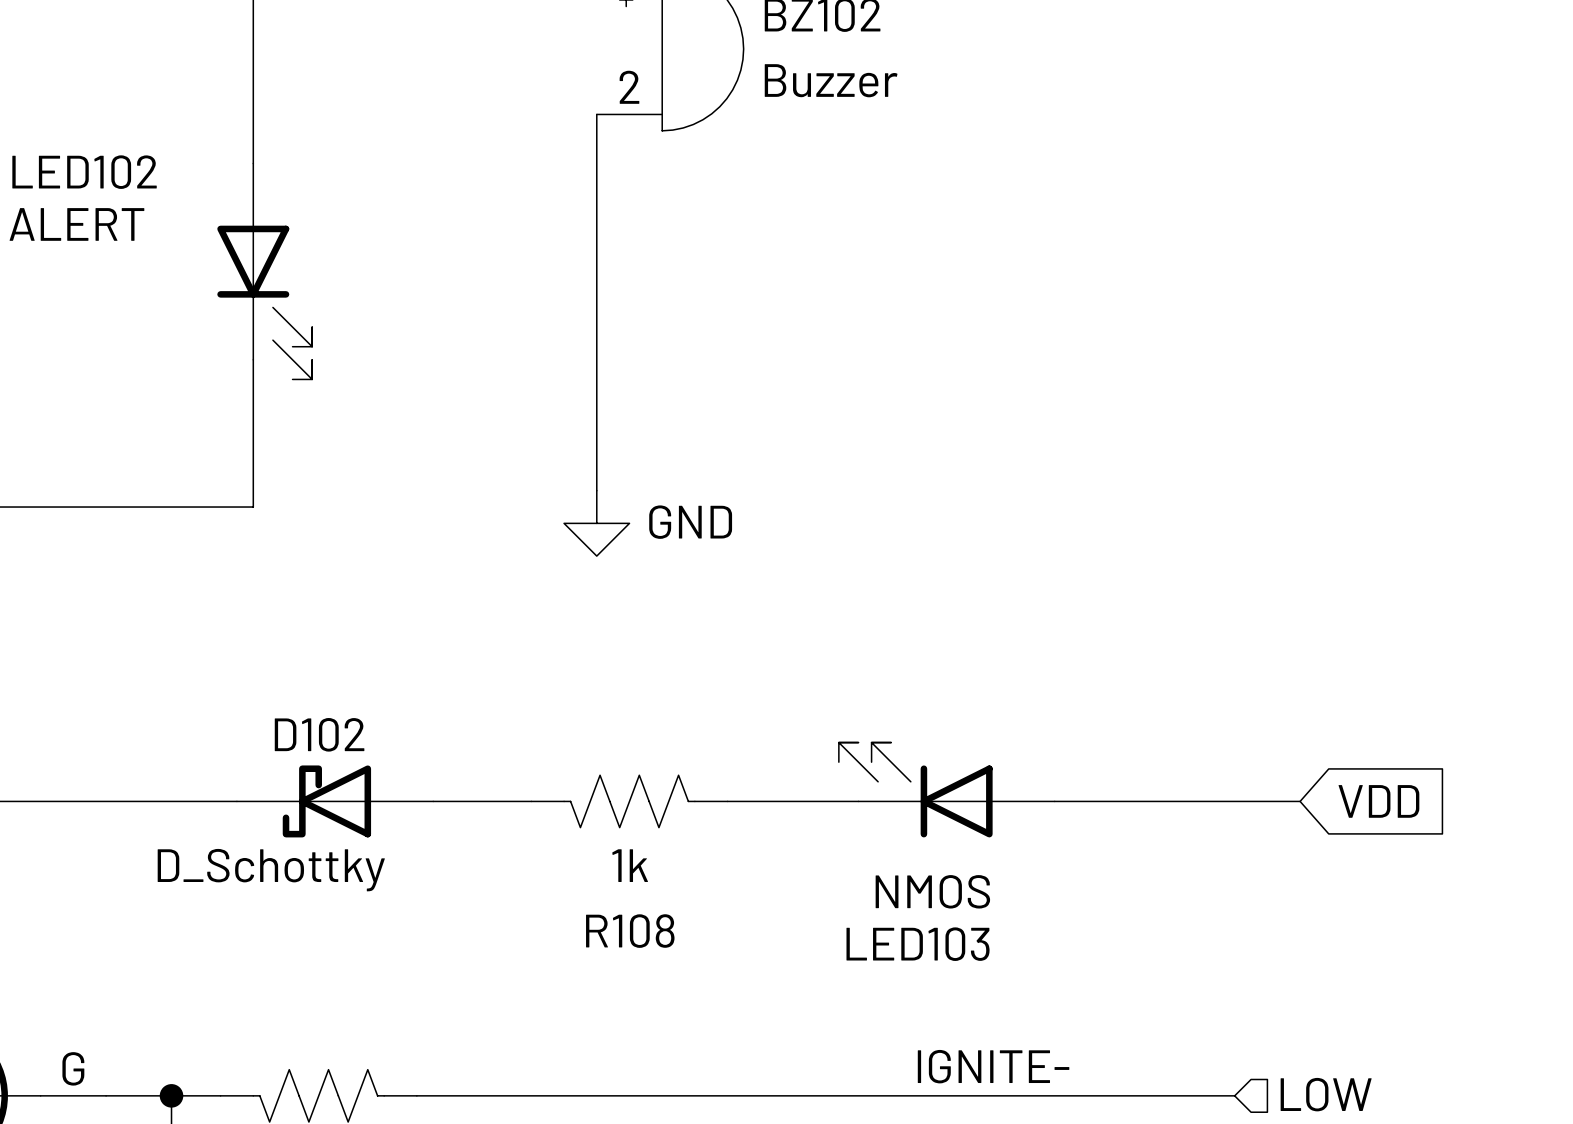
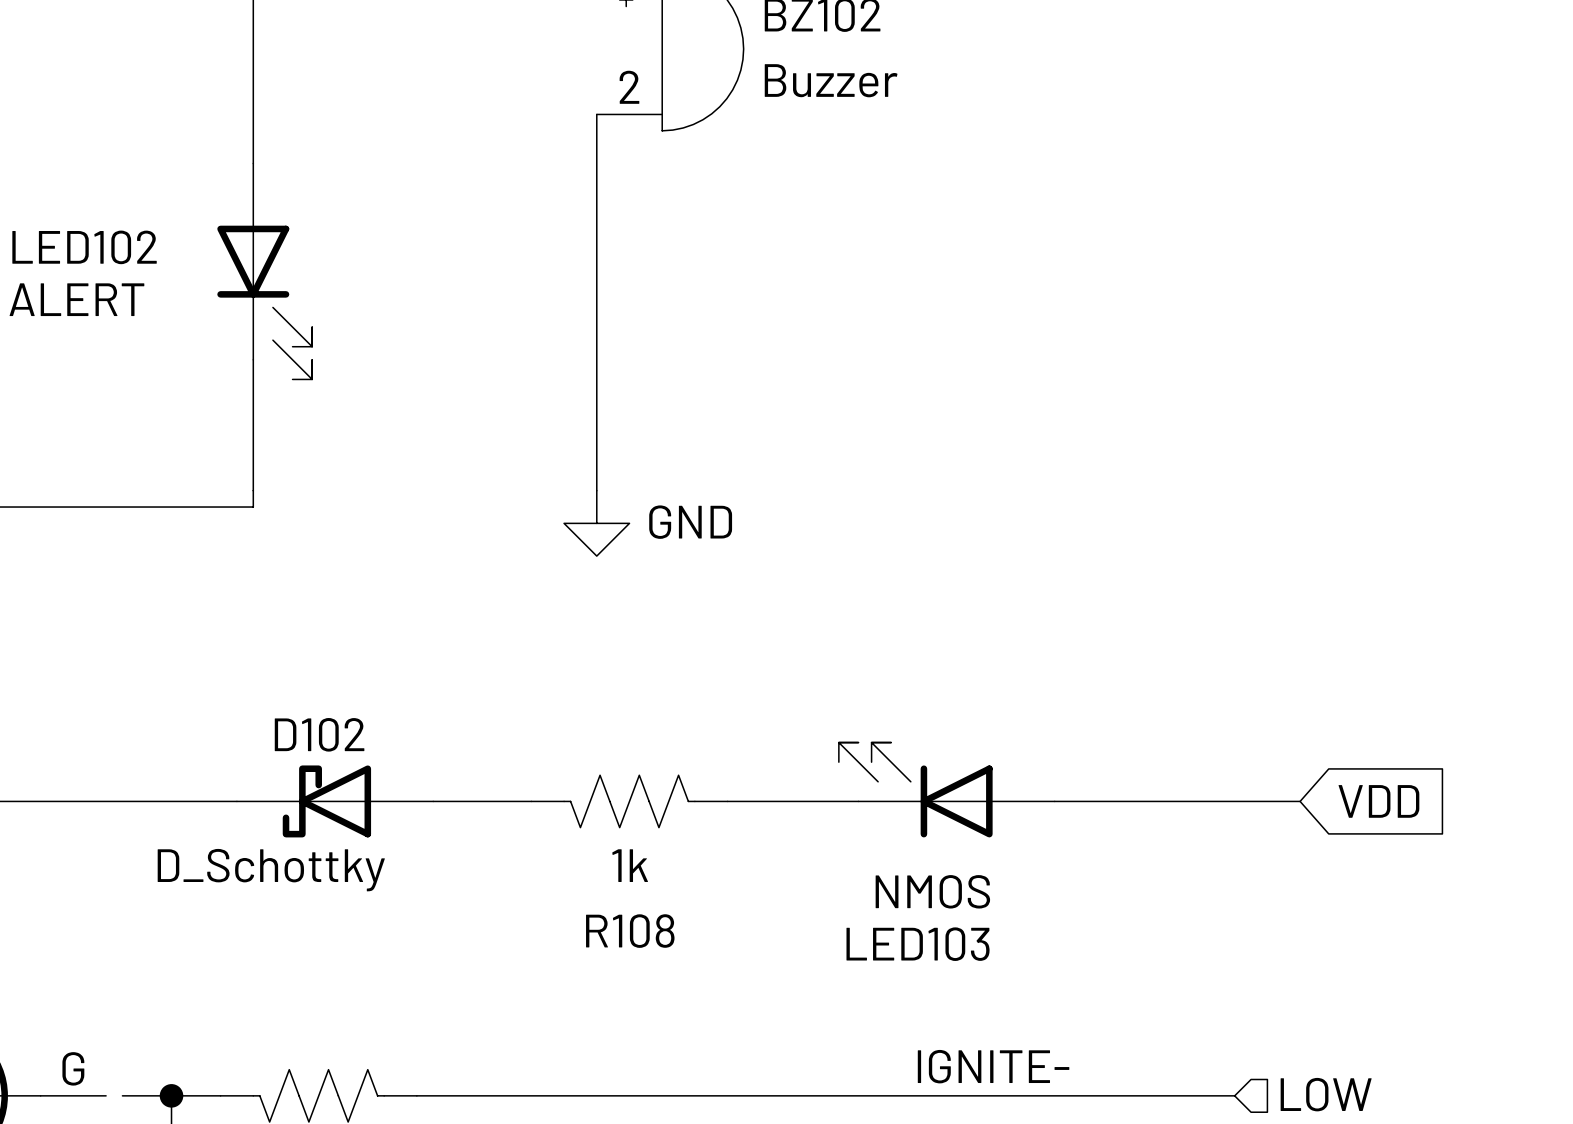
LED102 name position: LED102 (84, 172) -> LED102 (84, 247)
LED102 value position: ALERT (76, 224) -> ALERT (76, 299)
wire: (106, 1095) (122, 1095) -> none

